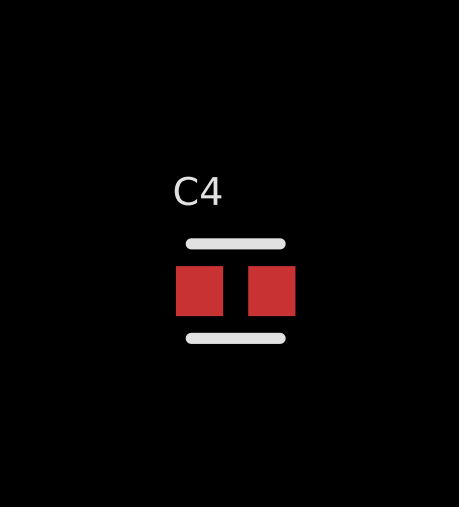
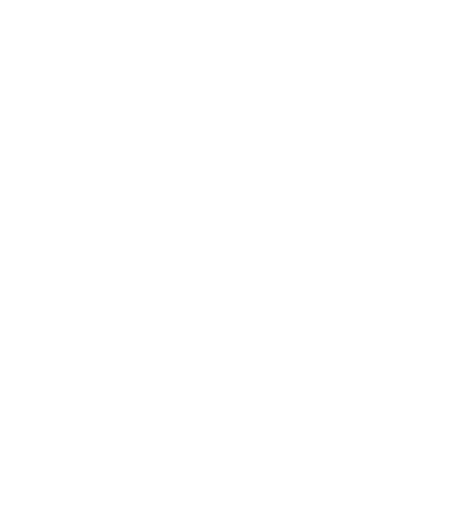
C4: (235, 291) -> none

